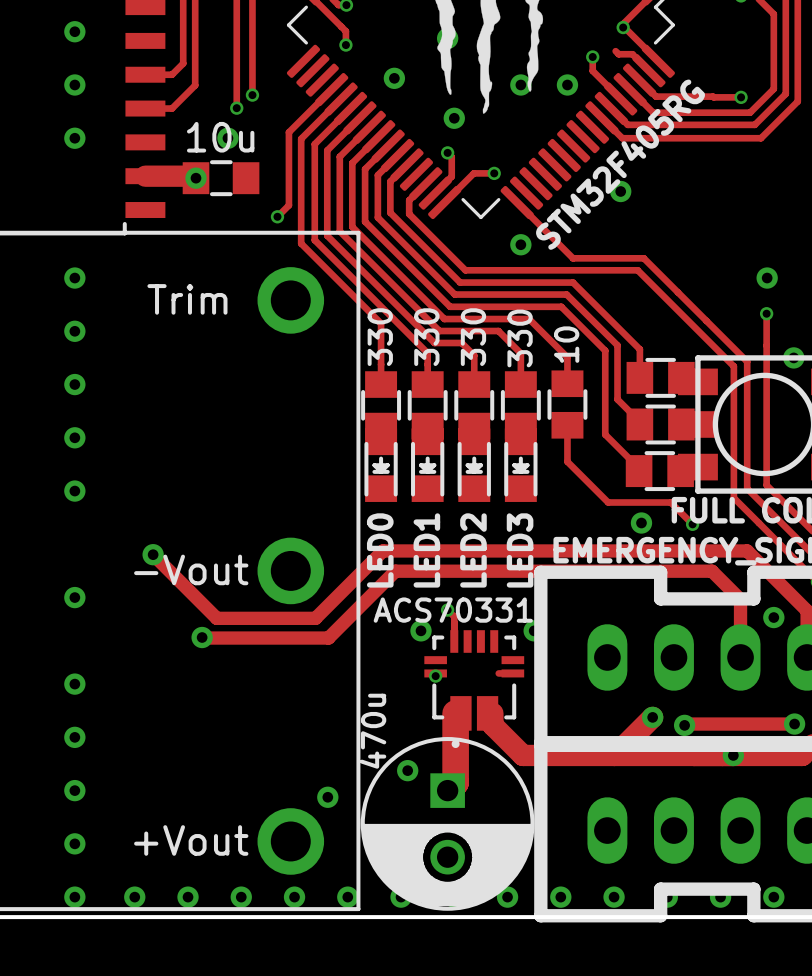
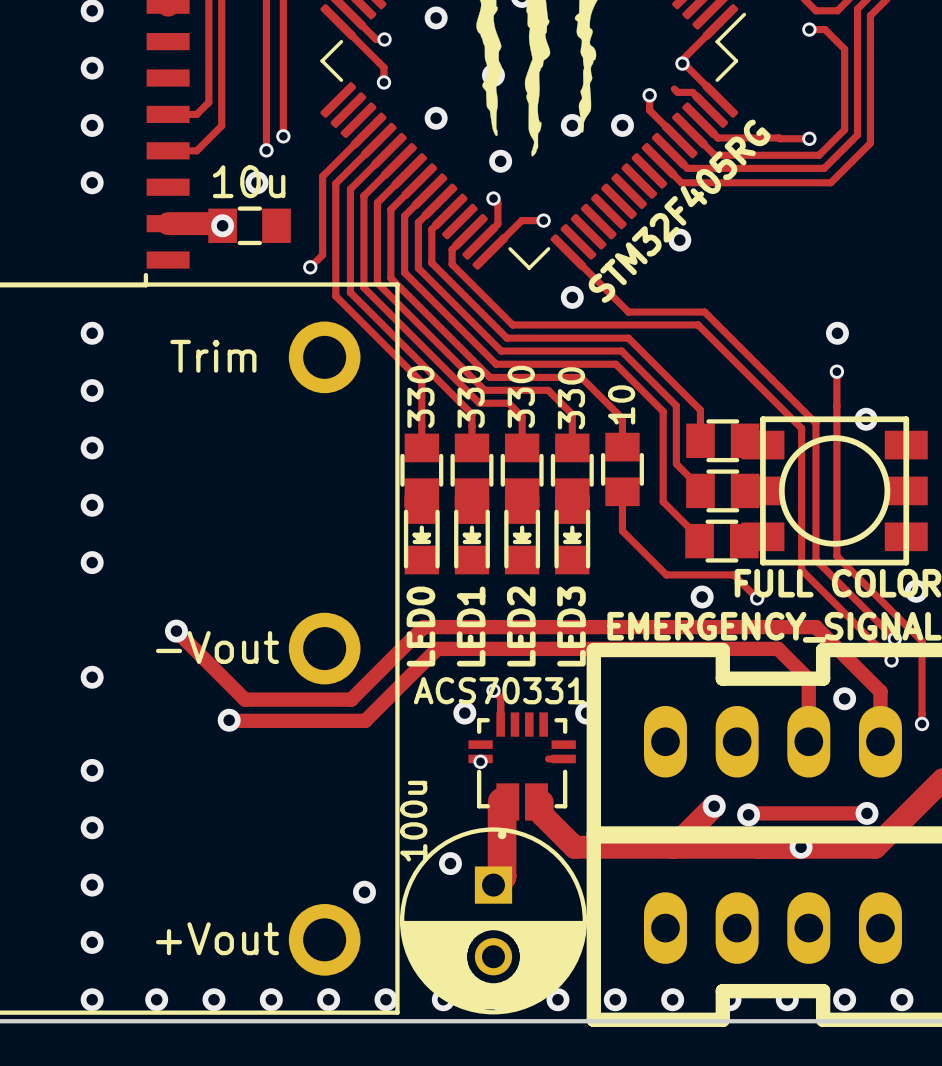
part value: 470u (373, 731) -> 100u (413, 821)

